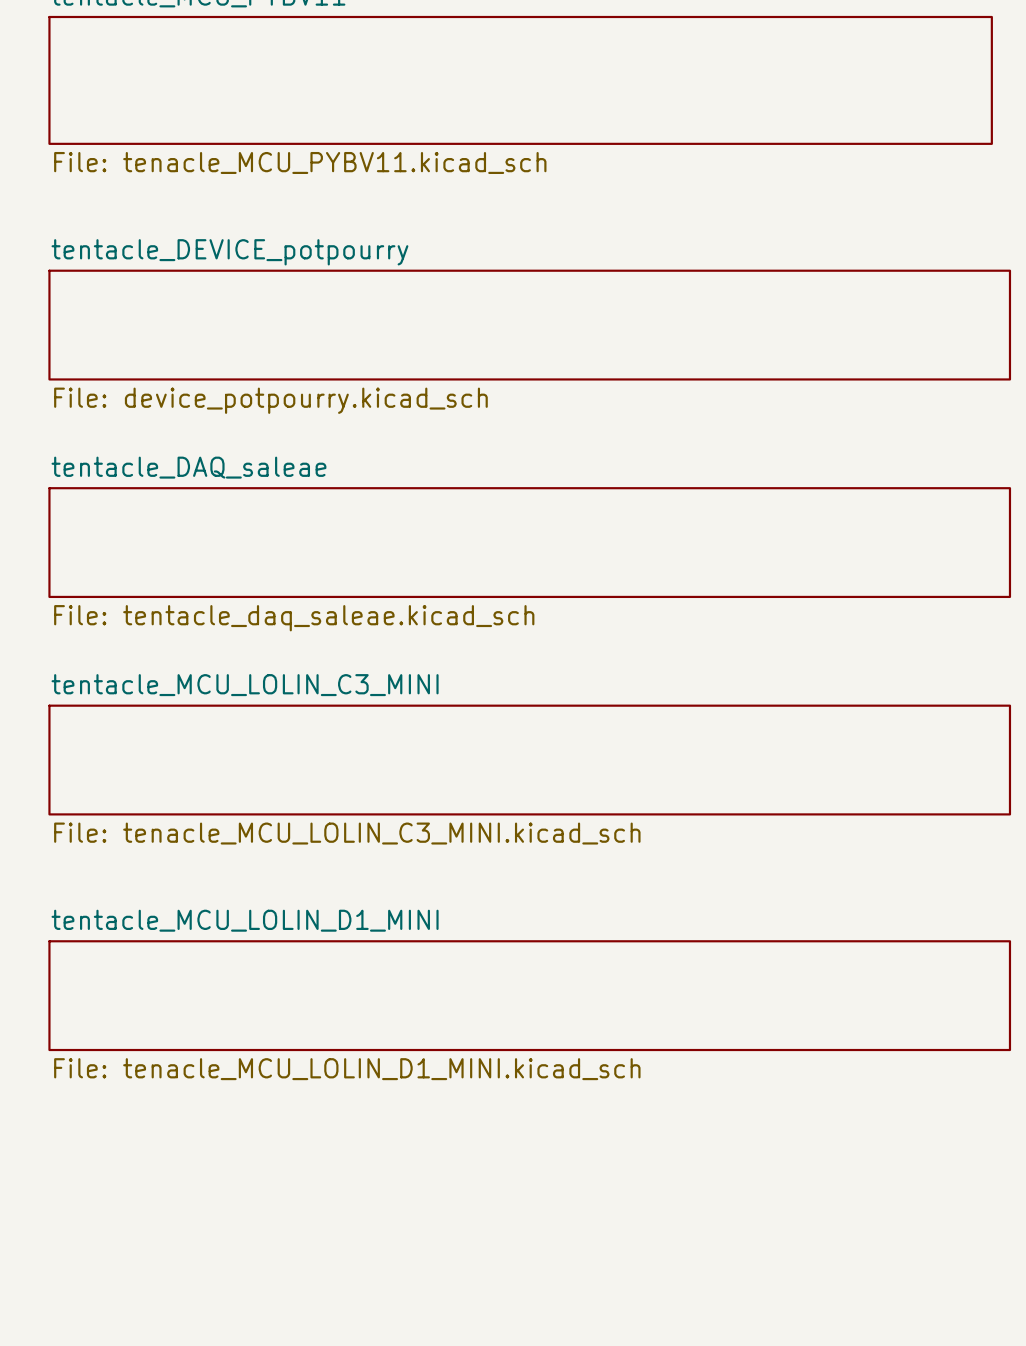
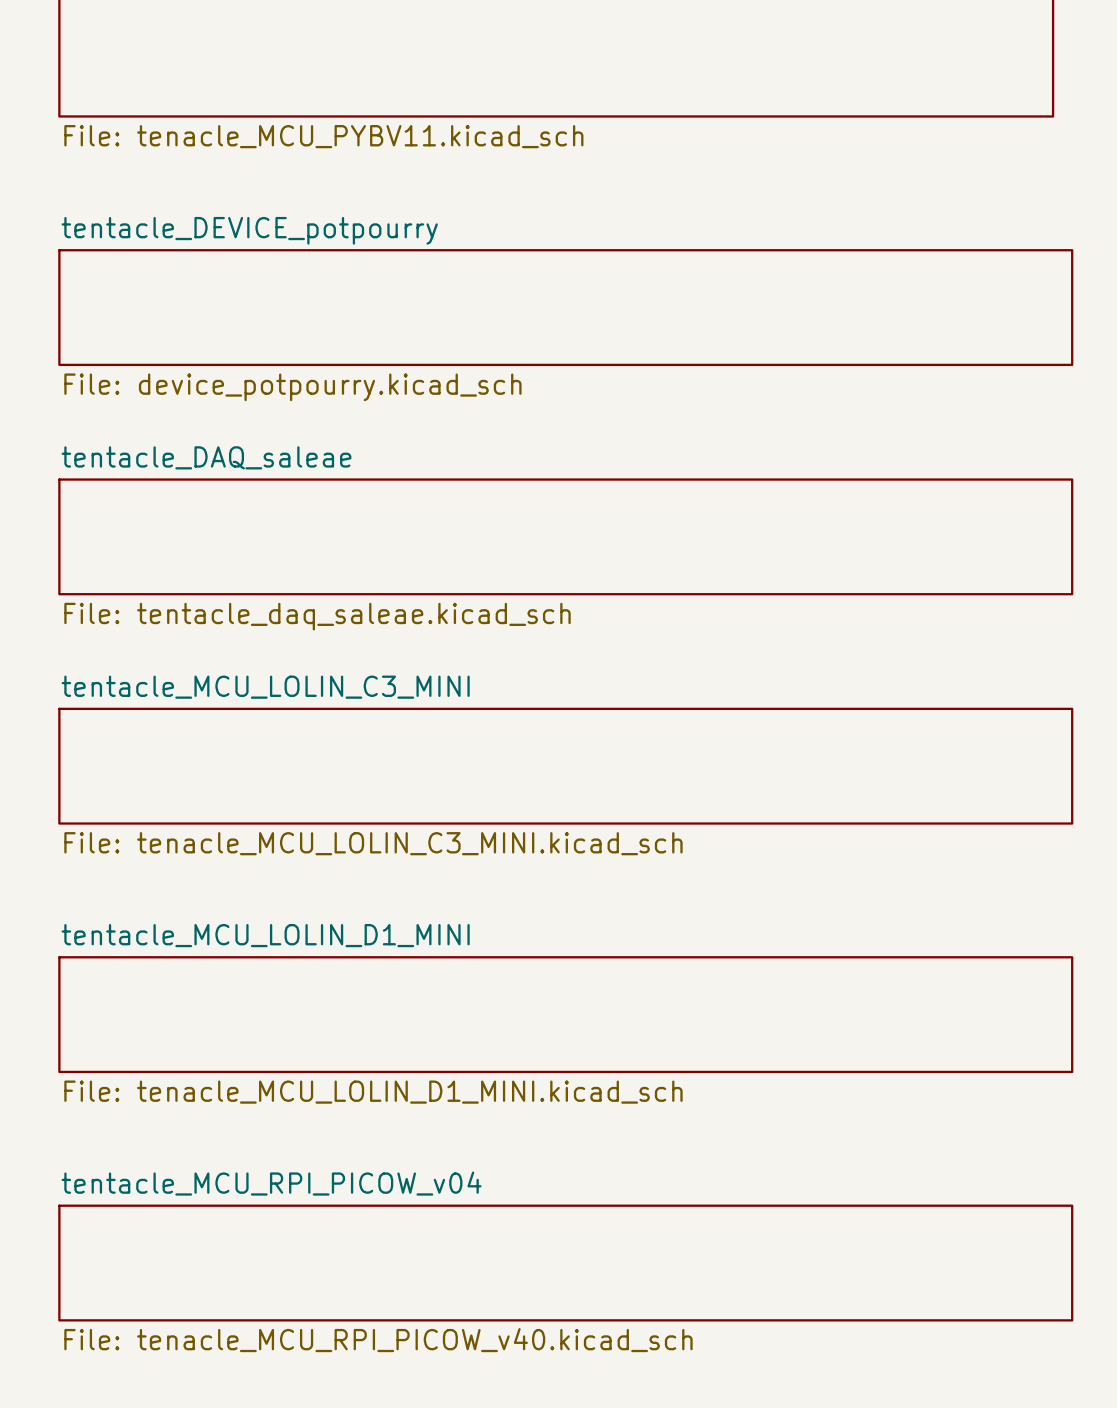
sheet tentacle_MCU_RPI_PICOW_v04: none -> File: tenacle_MCU_RPI_PICOW_v40.kicad_sch (565, 1263)

